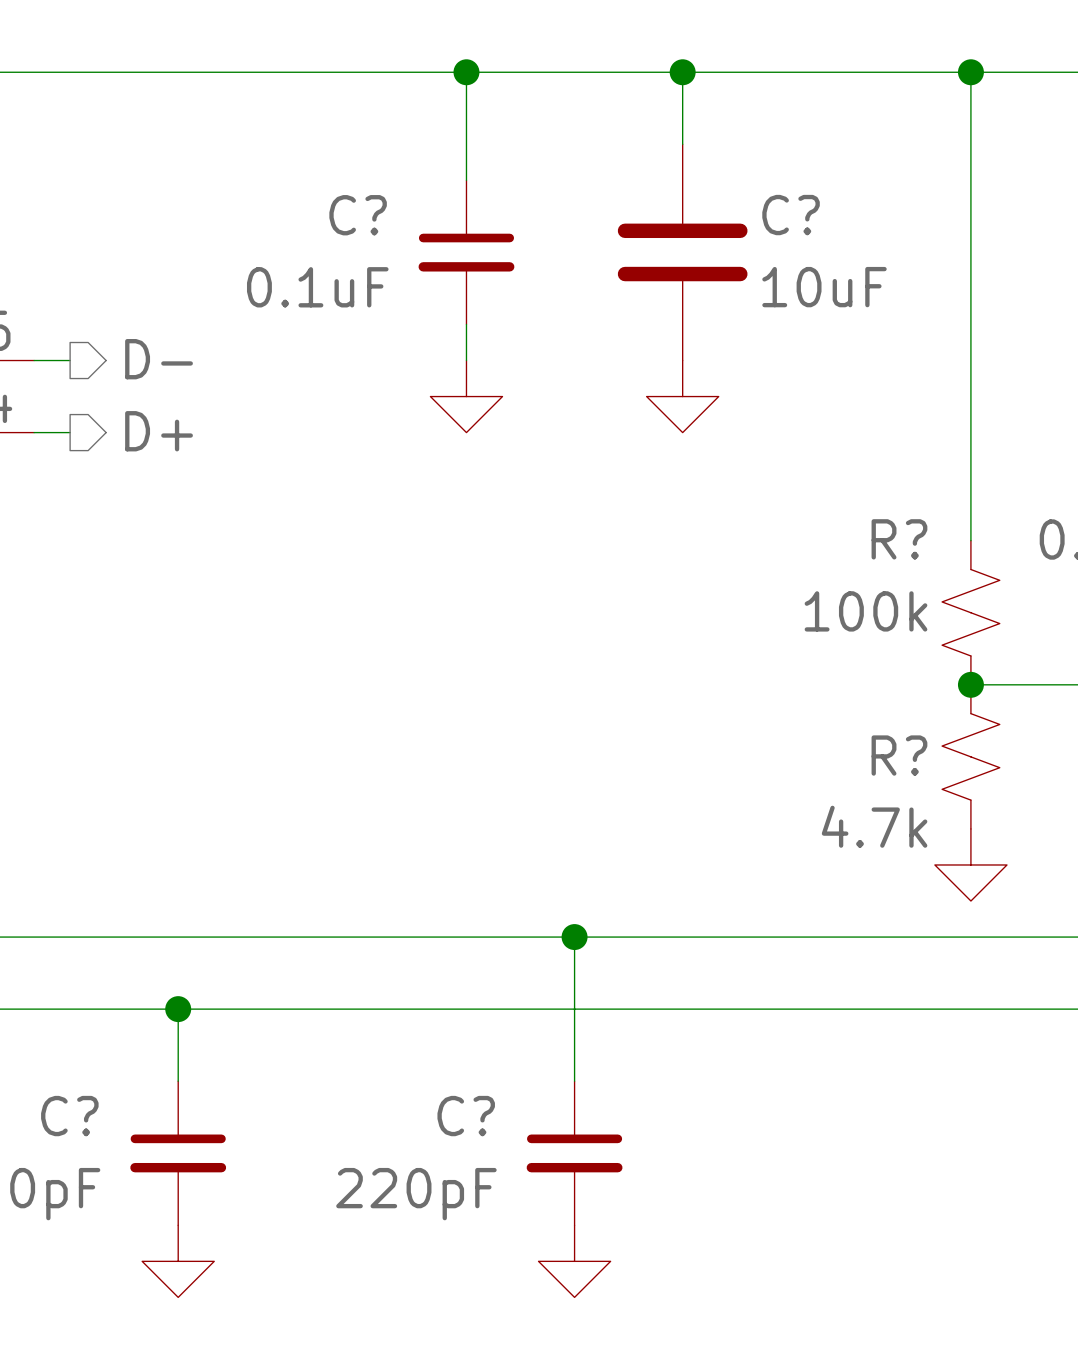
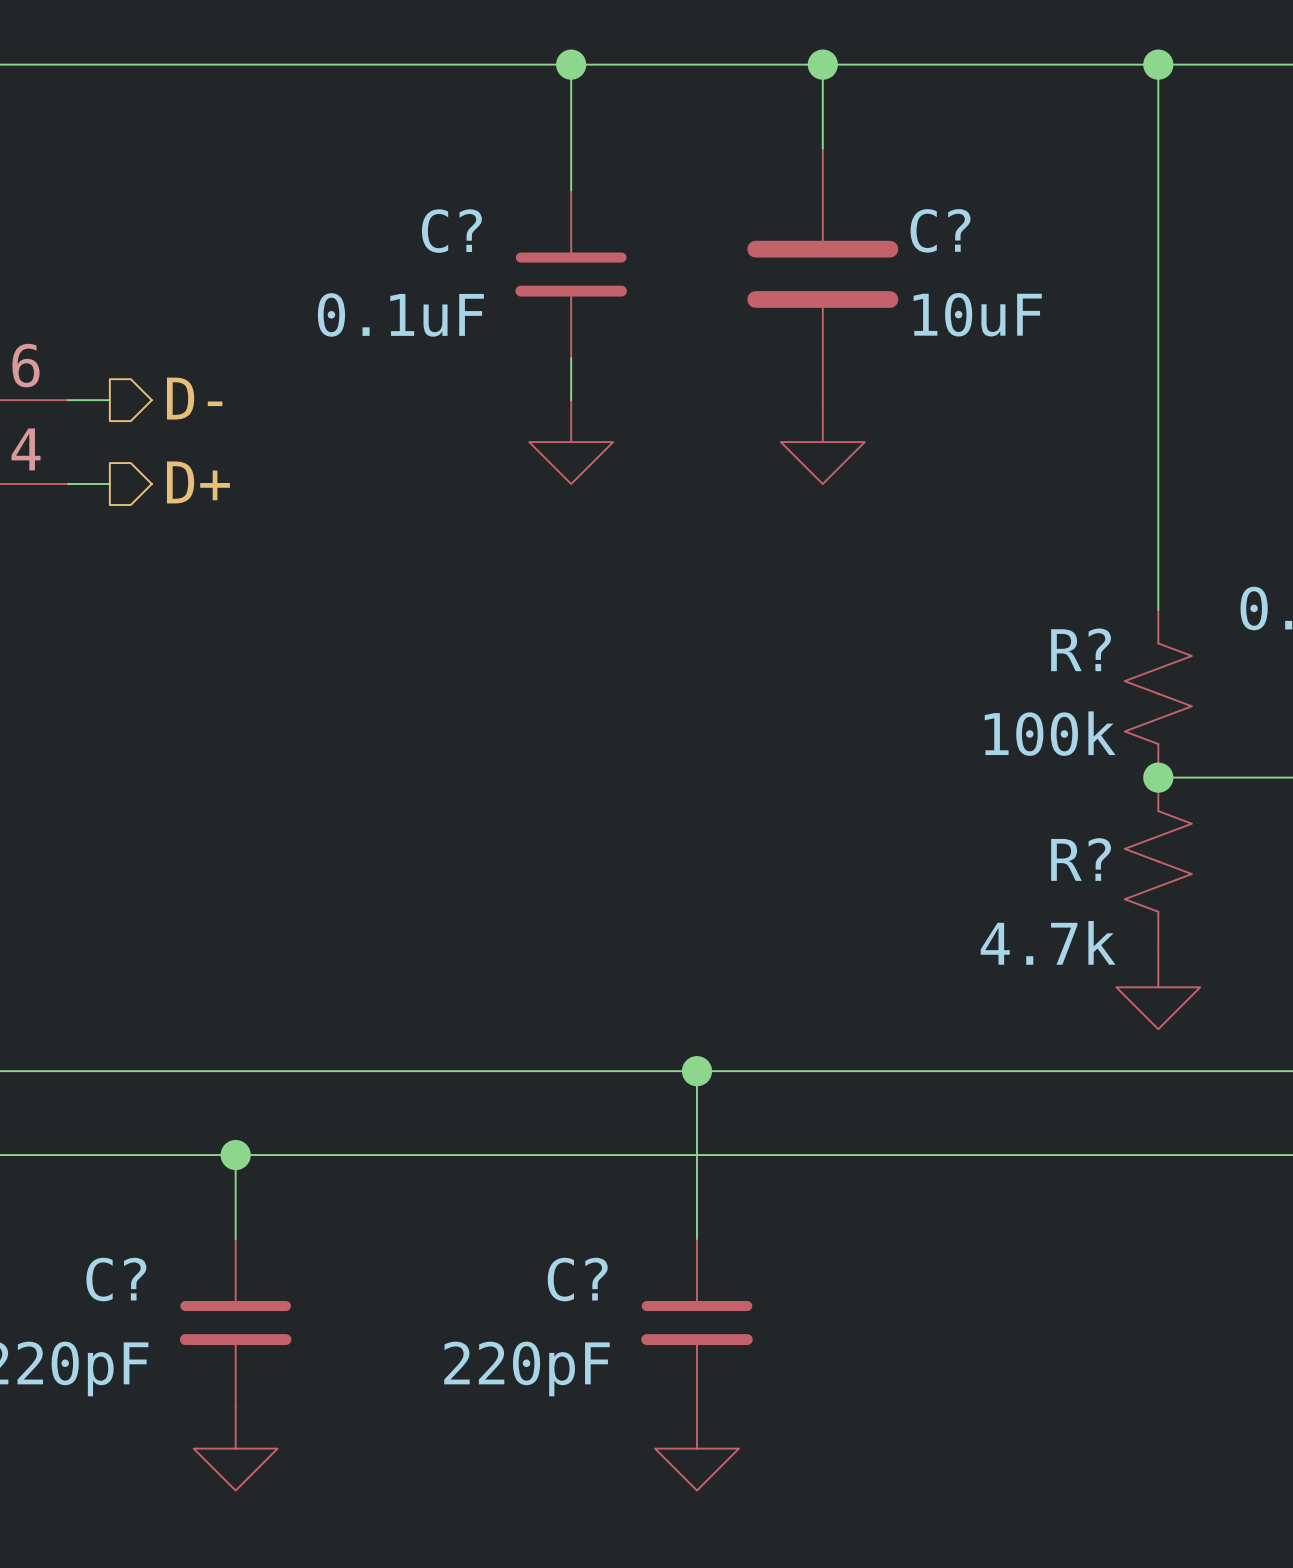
R? name position: R? (899, 539) -> R? (1081, 649)
R? value position: 100k (866, 611) -> 100k (1050, 733)

